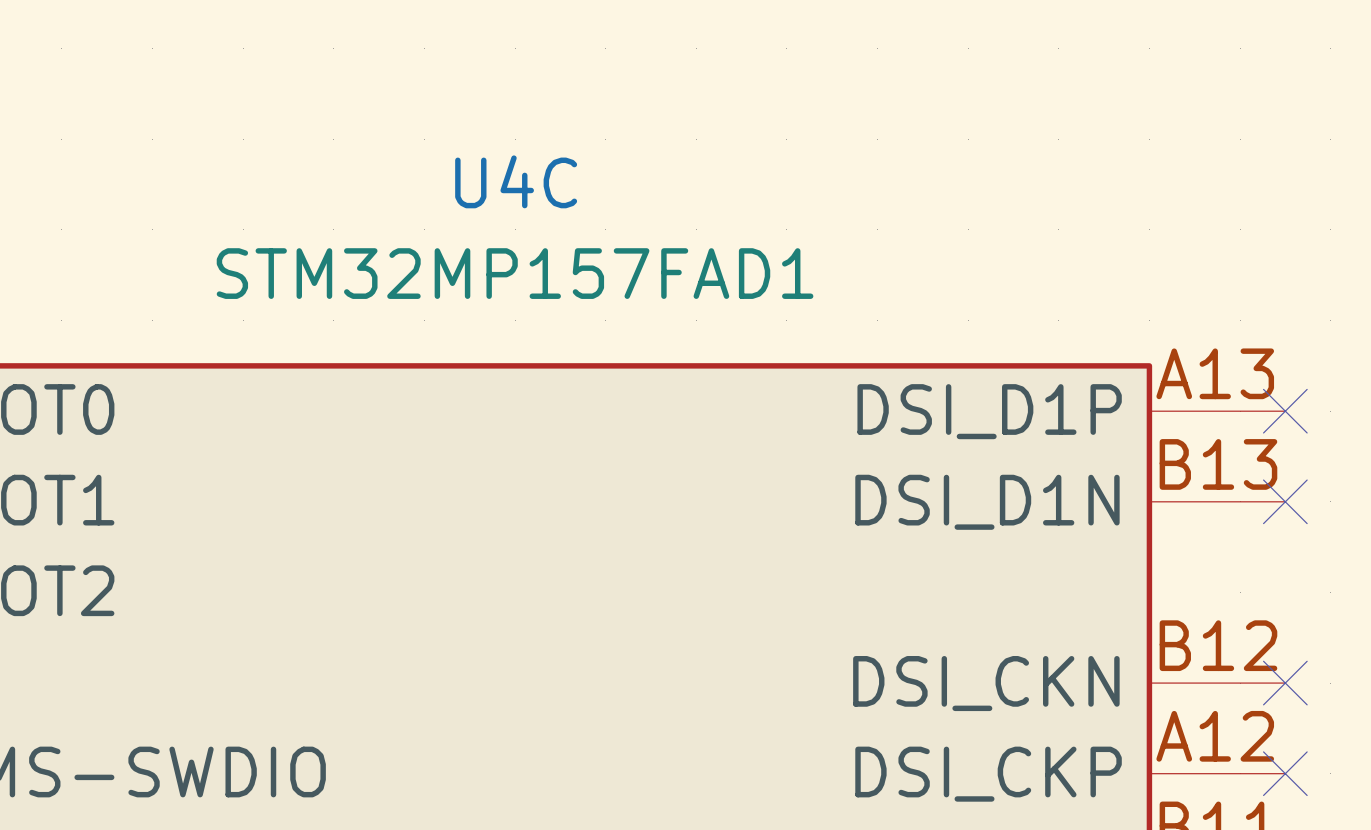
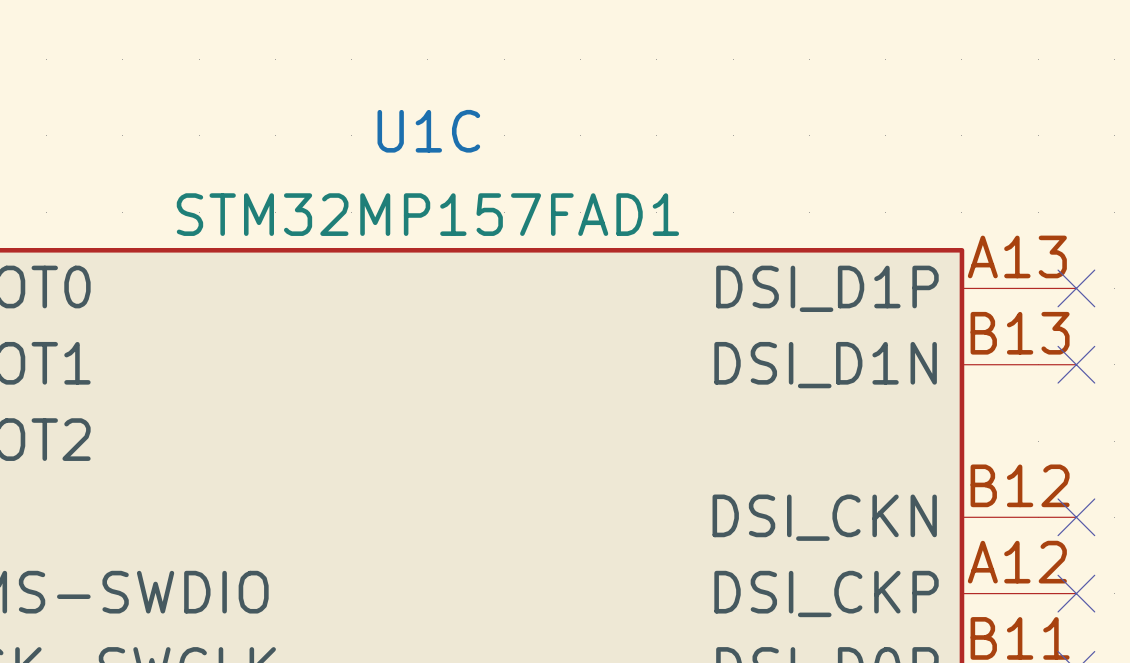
U4C name: U4C (516, 181) -> U1C (428, 131)
U4C value position: STM32MP157FAD1 (515, 273) -> STM32MP157FAD1 (427, 214)

